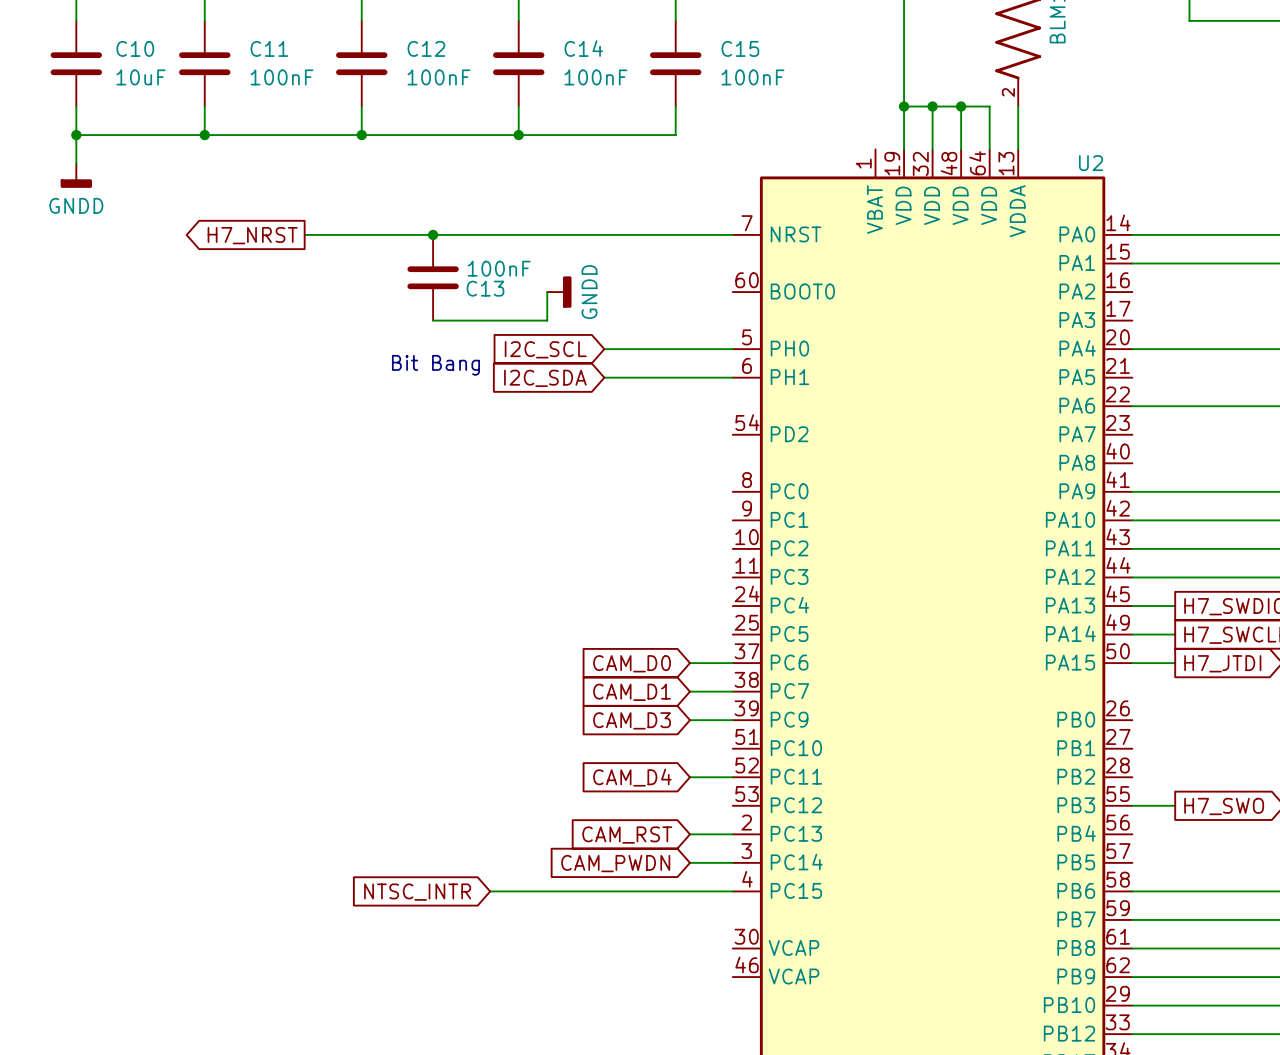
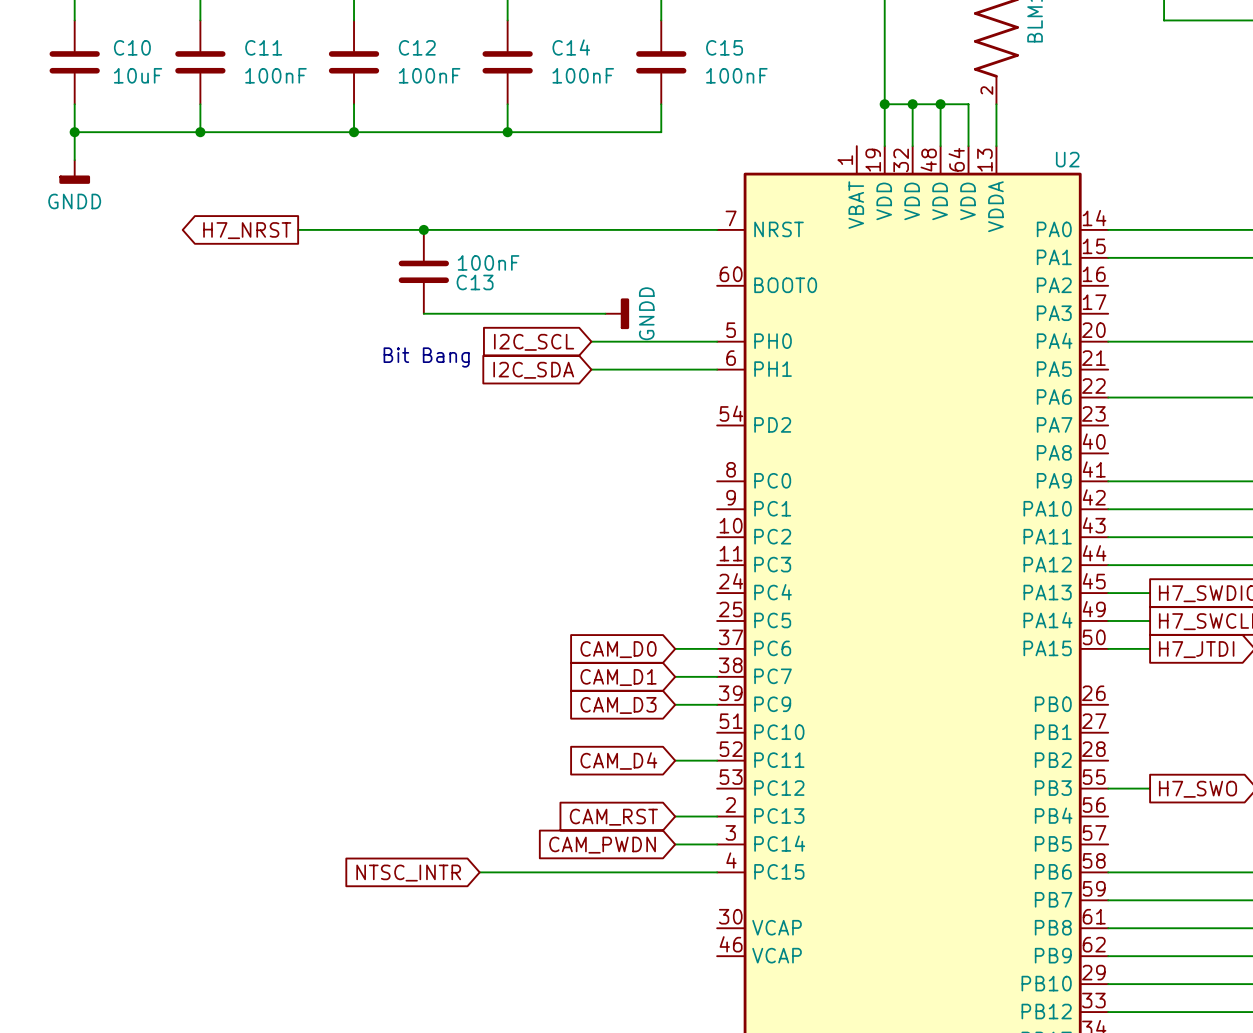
wire: (547, 292) (547, 320) -> (605, 313) (535, 313)
power symbol position: GNDD (559, 292) -> GNDD (617, 313)

